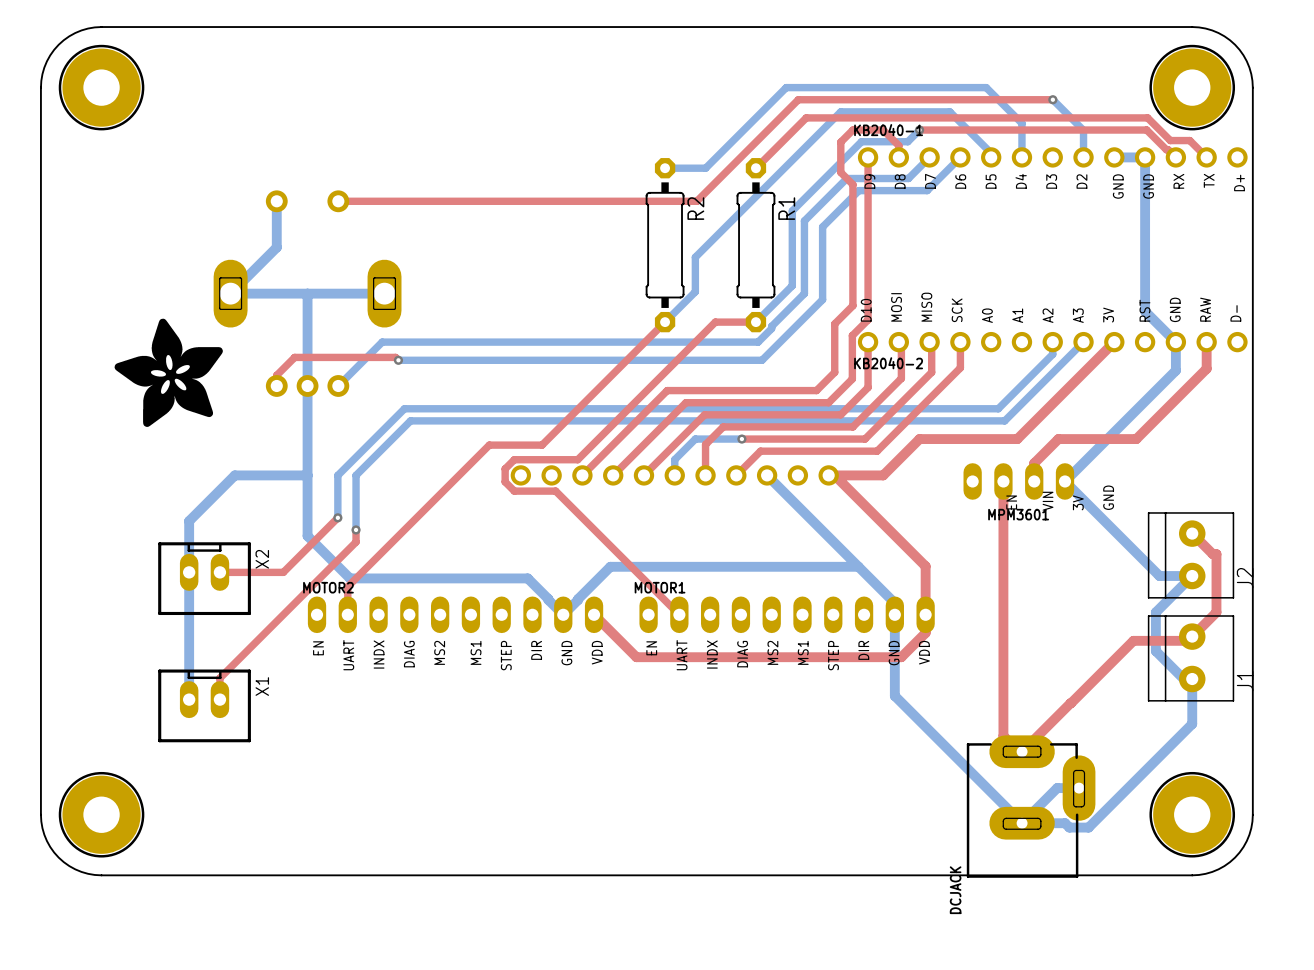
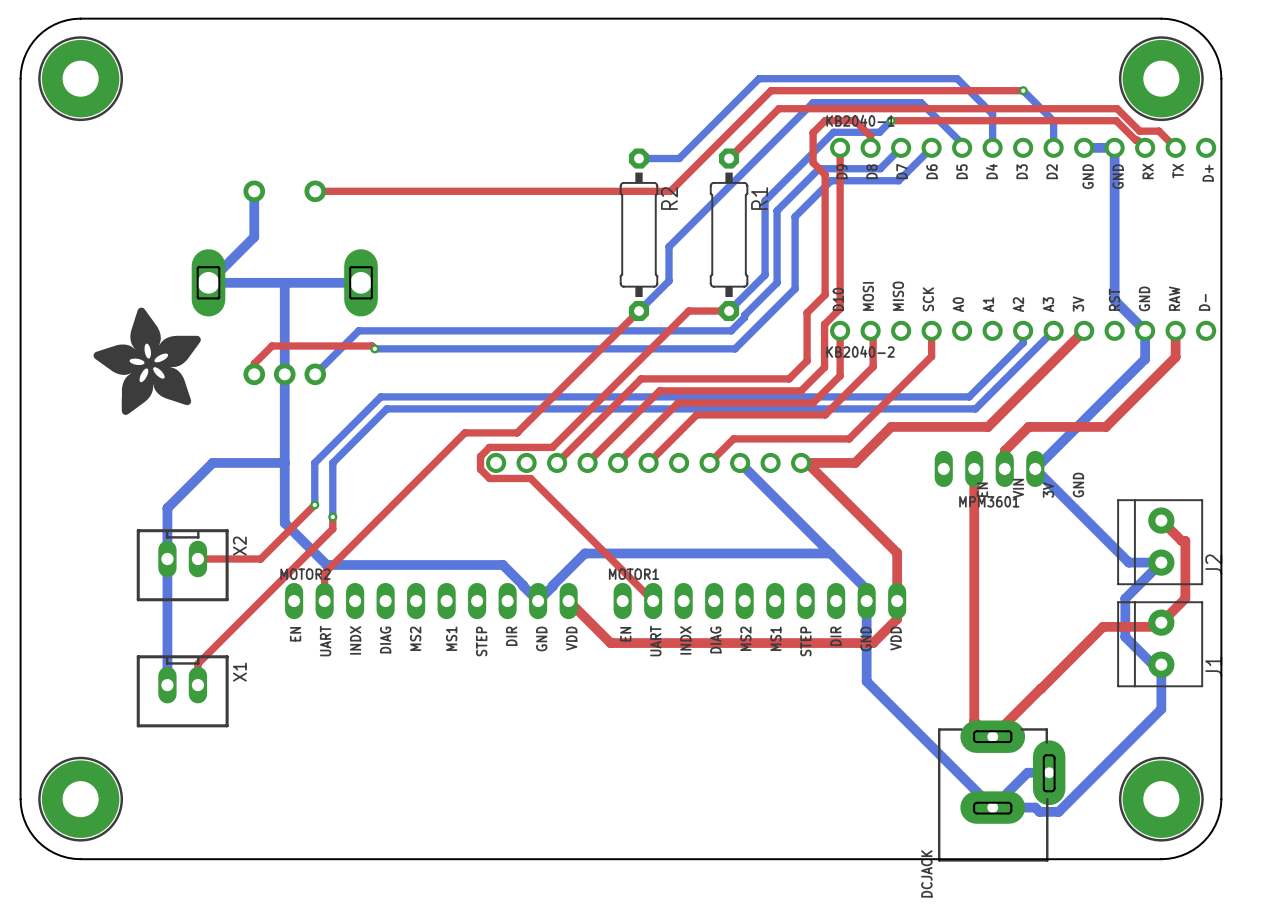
top track: (929, 342) (931, 344) (931, 372) (865, 439) (741, 439) -> none
bottom track: (741, 439) (695, 439) (674, 459) (674, 475) -> none
via: (741, 439) -> none
top track: (705, 444) (705, 475) -> (679, 432) (648, 462)

